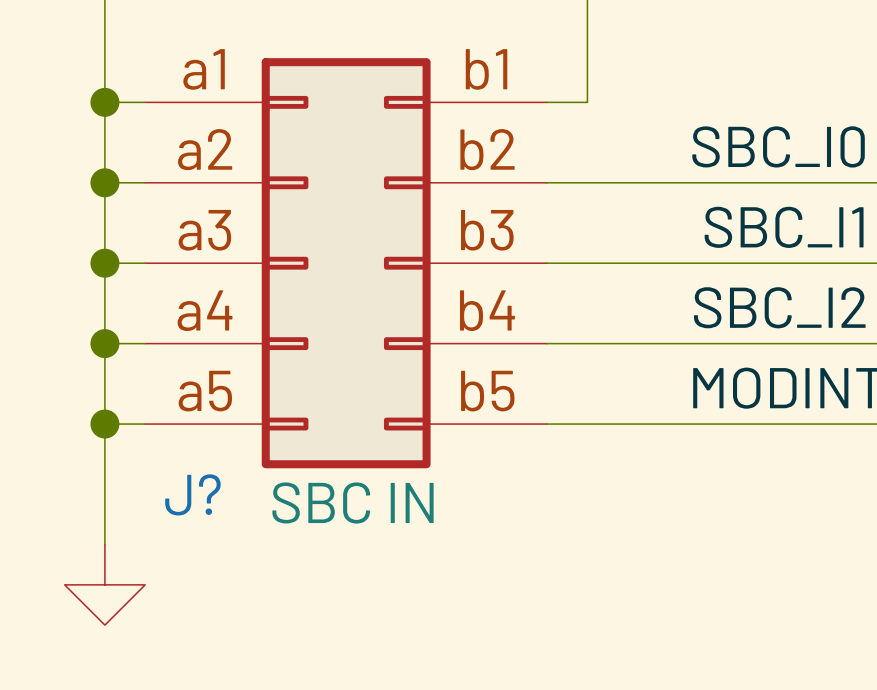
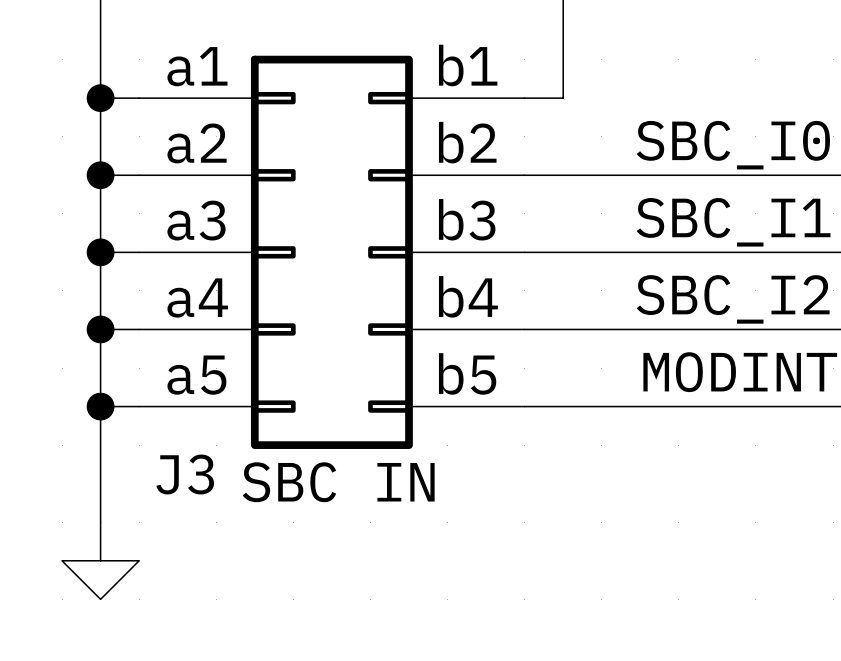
J? name: J? (192, 494) -> J3 (185, 474)

